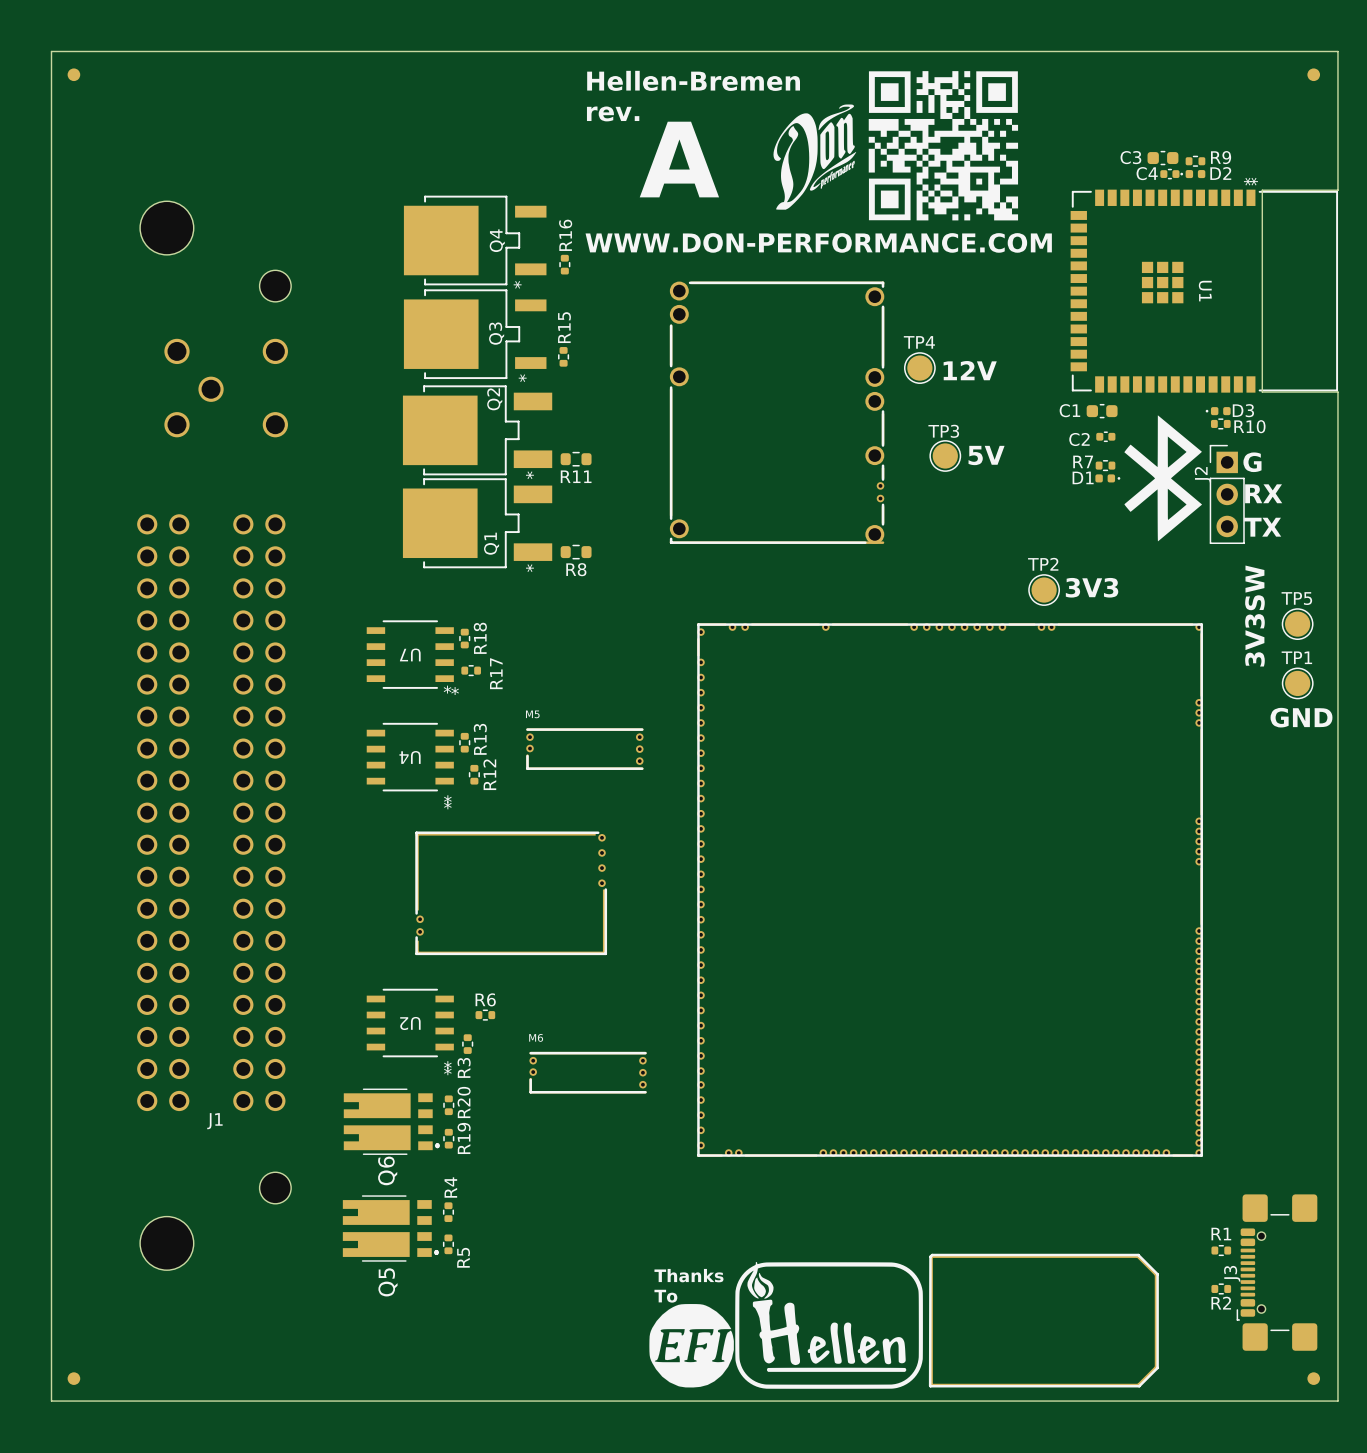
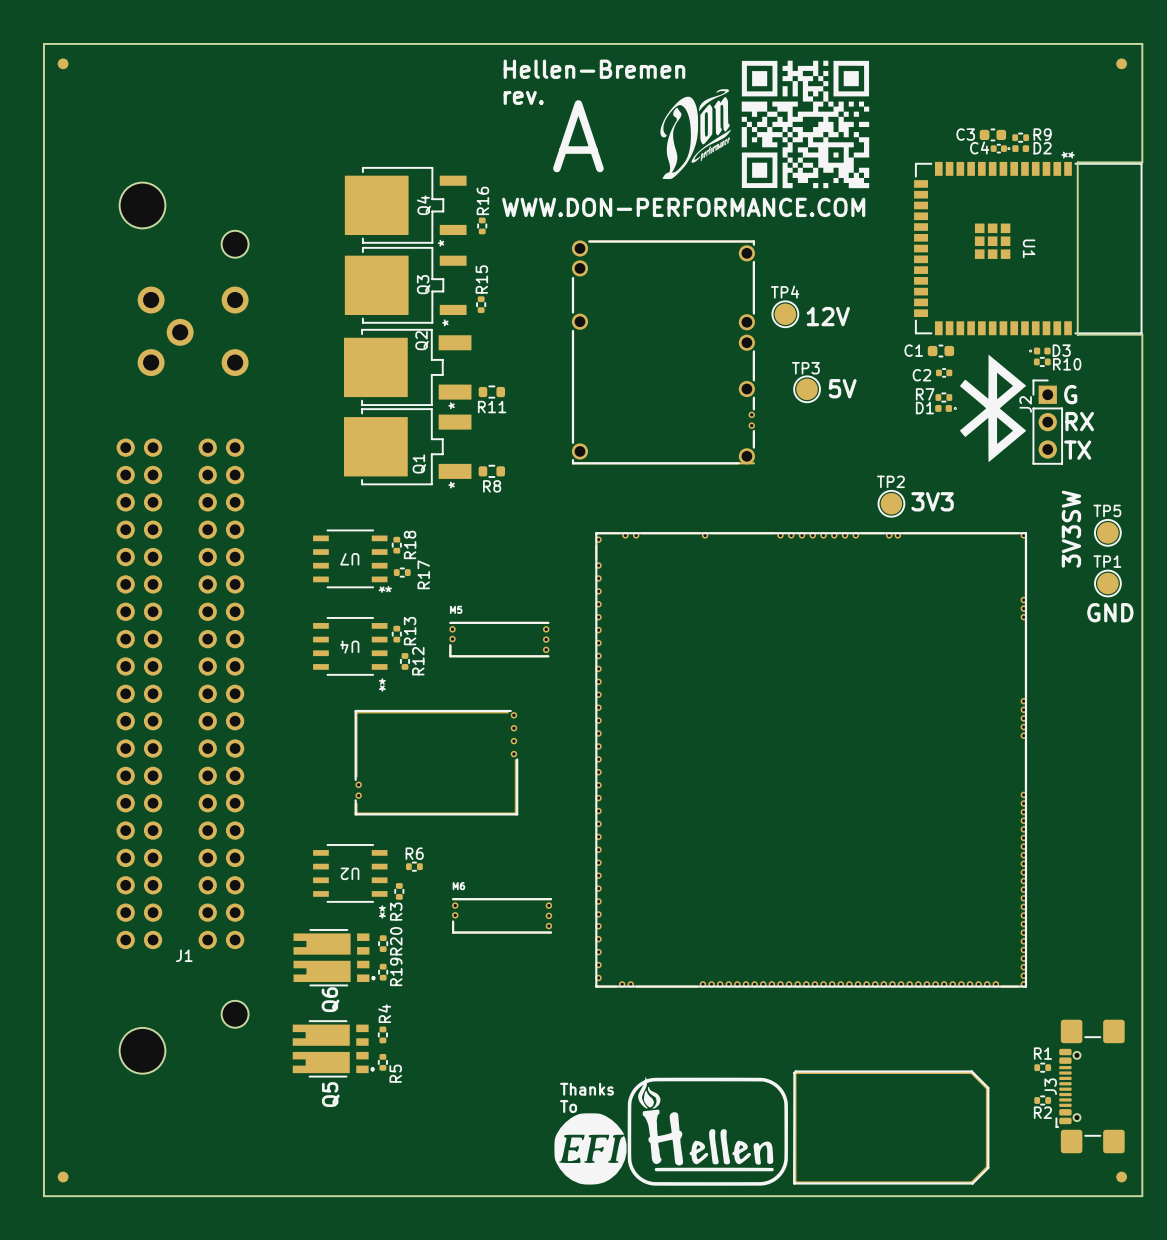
J1 footprint: [137, 201, 292, 1271] -> [116, 182, 249, 1074]

